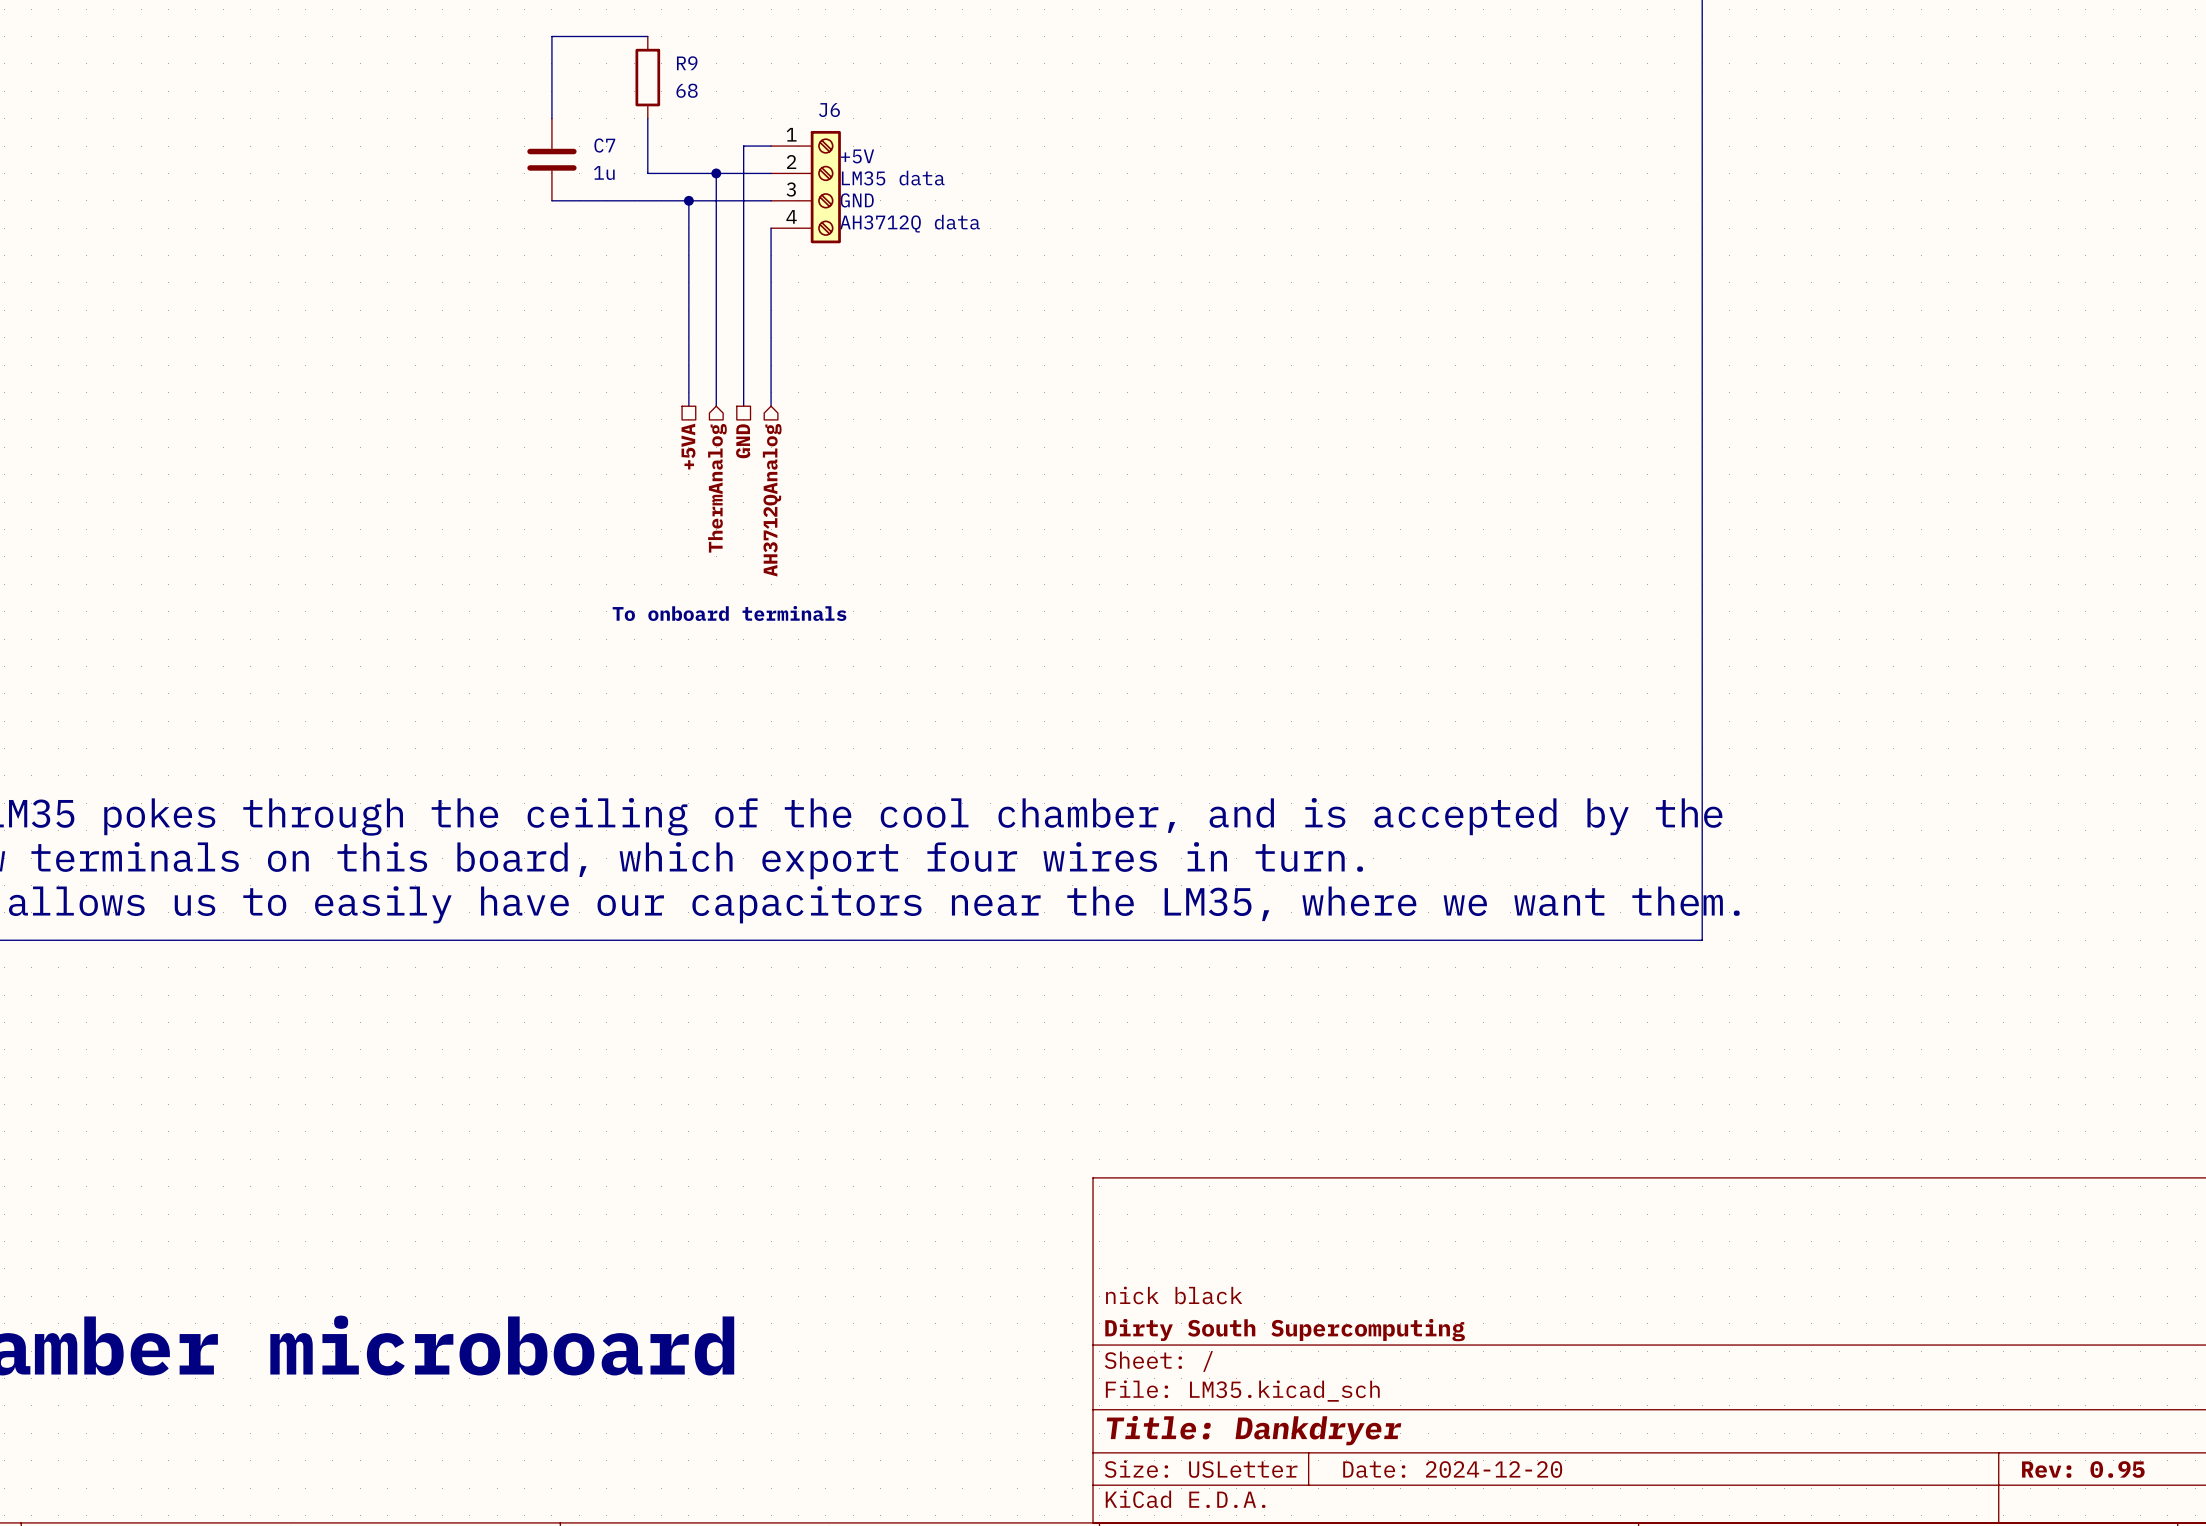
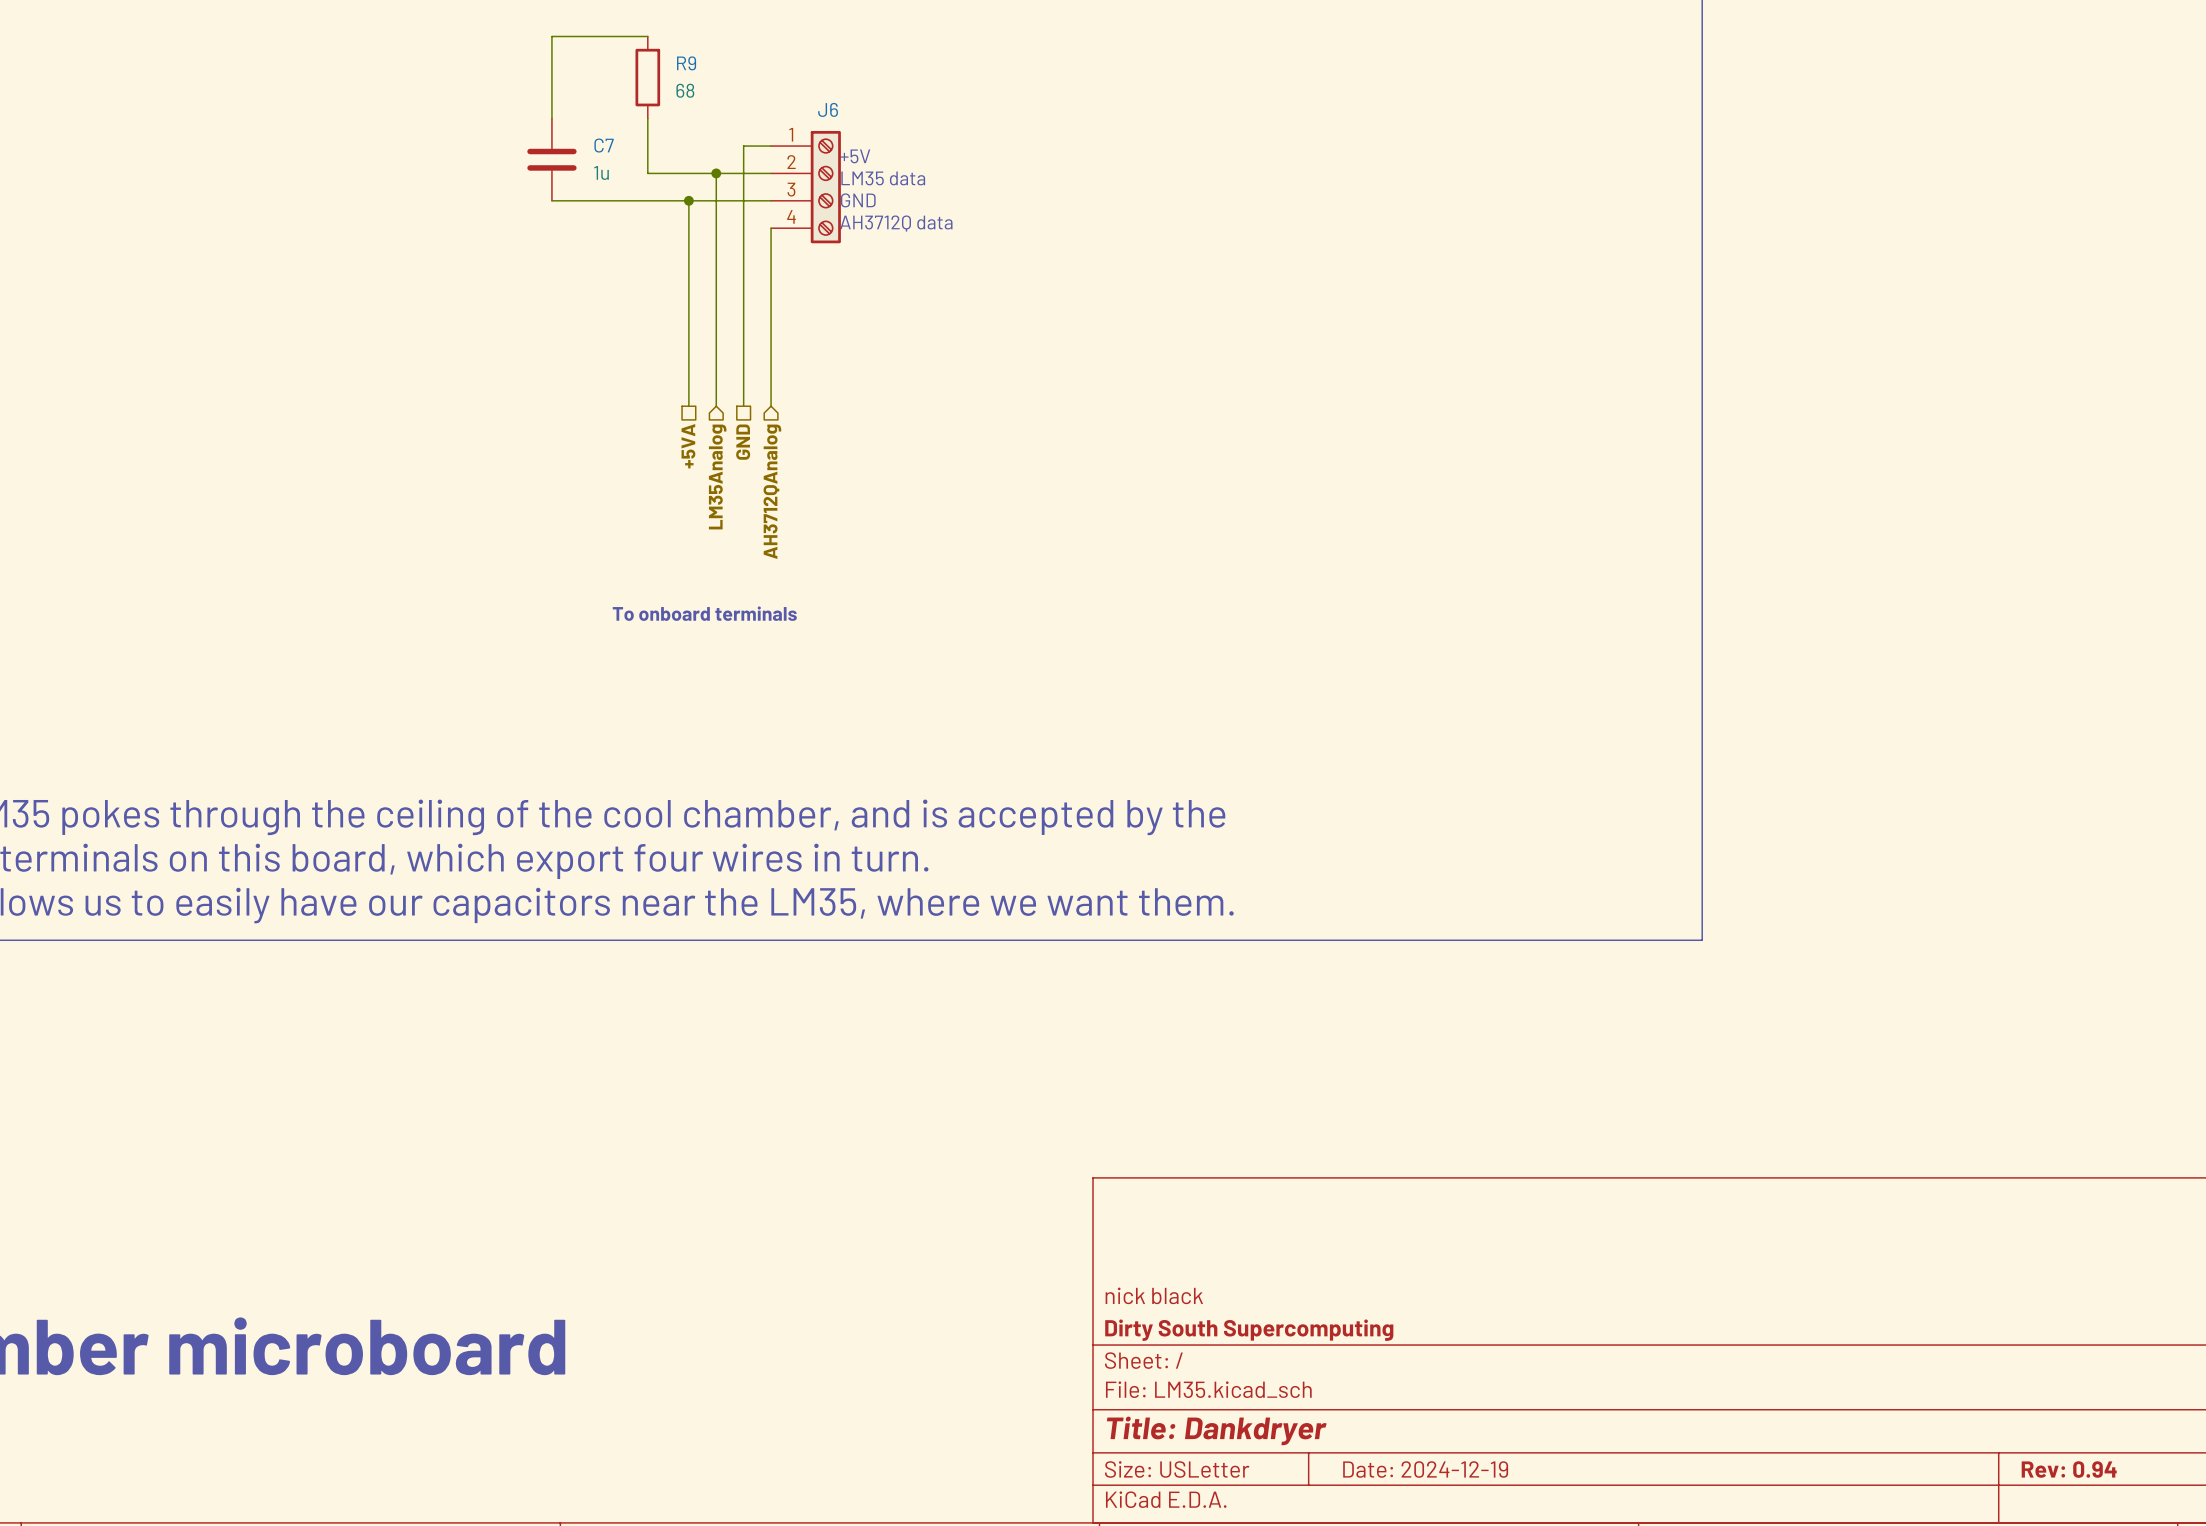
hierarchical label: ThermAnalog (717, 488) -> LM35Analog (717, 476)
title block: Date: 2024-12-20 (1452, 1469) -> Date: 2024-12-19 (1425, 1469)
title block: Rev: 0.95 (2083, 1469) -> Rev: 0.94 (2069, 1469)

